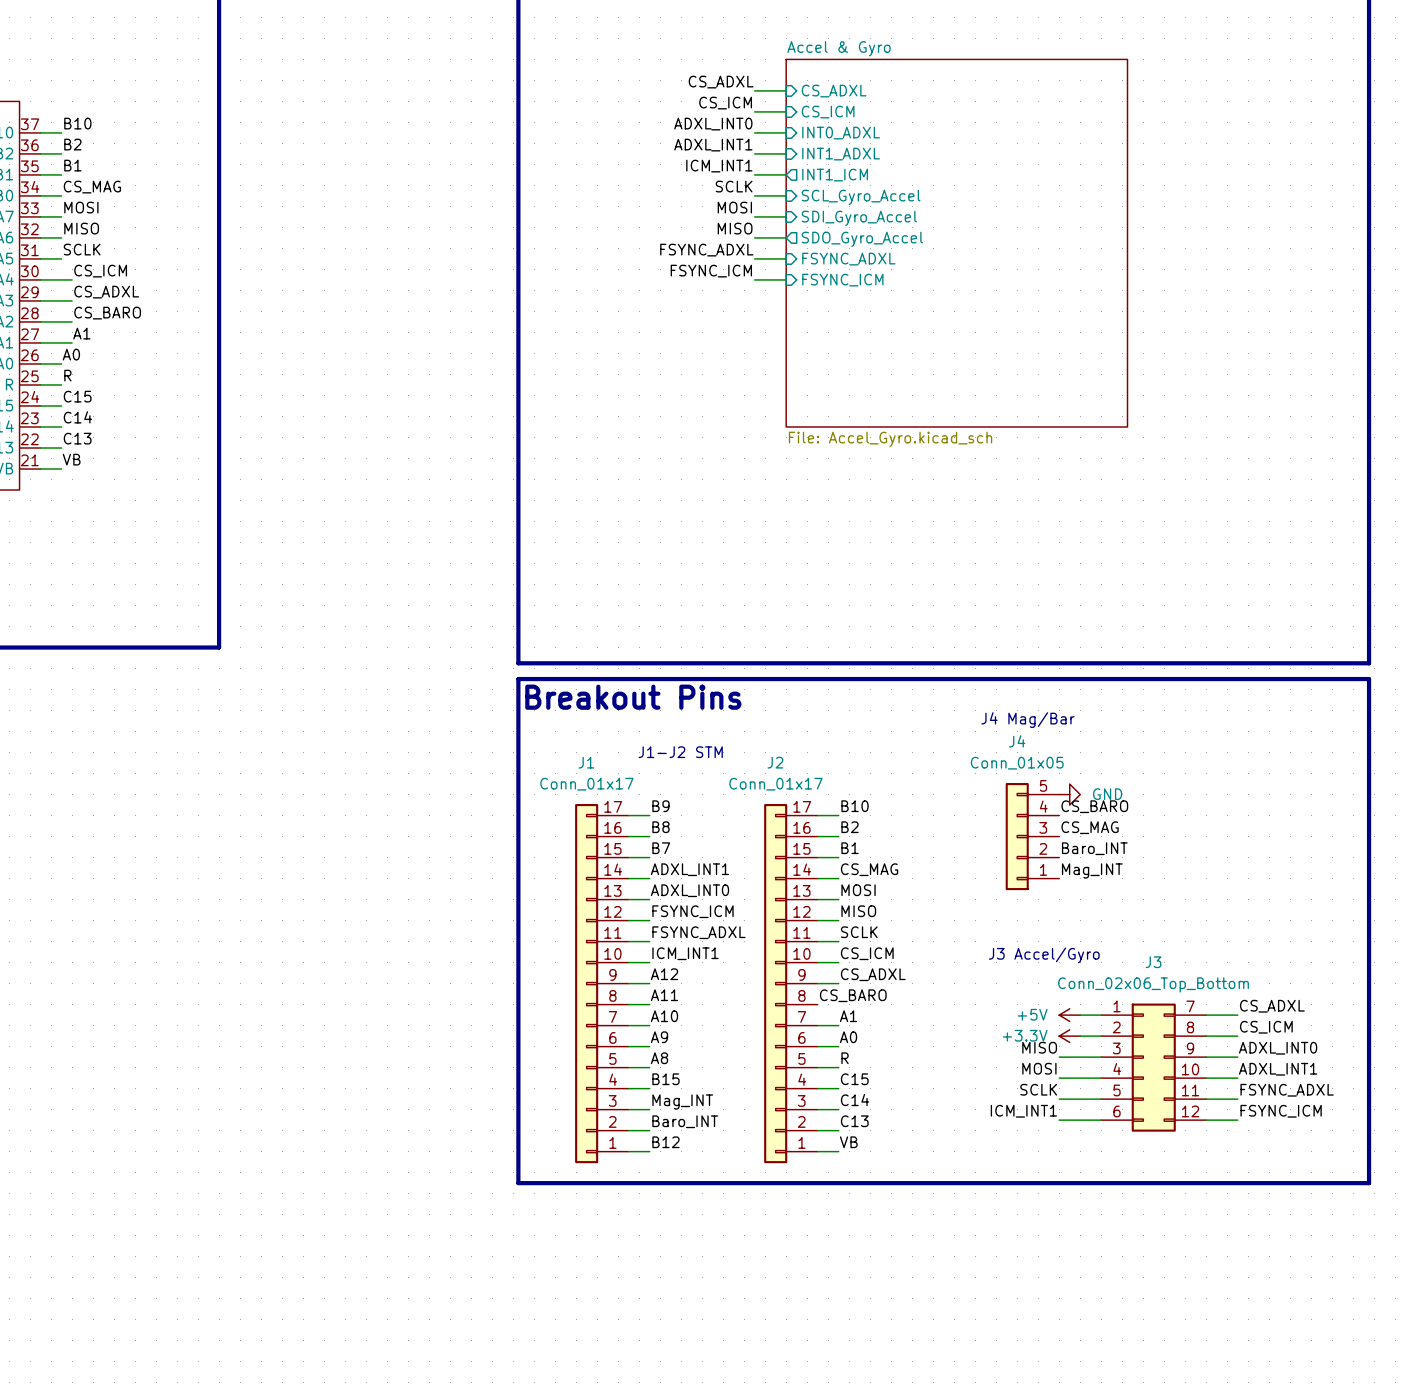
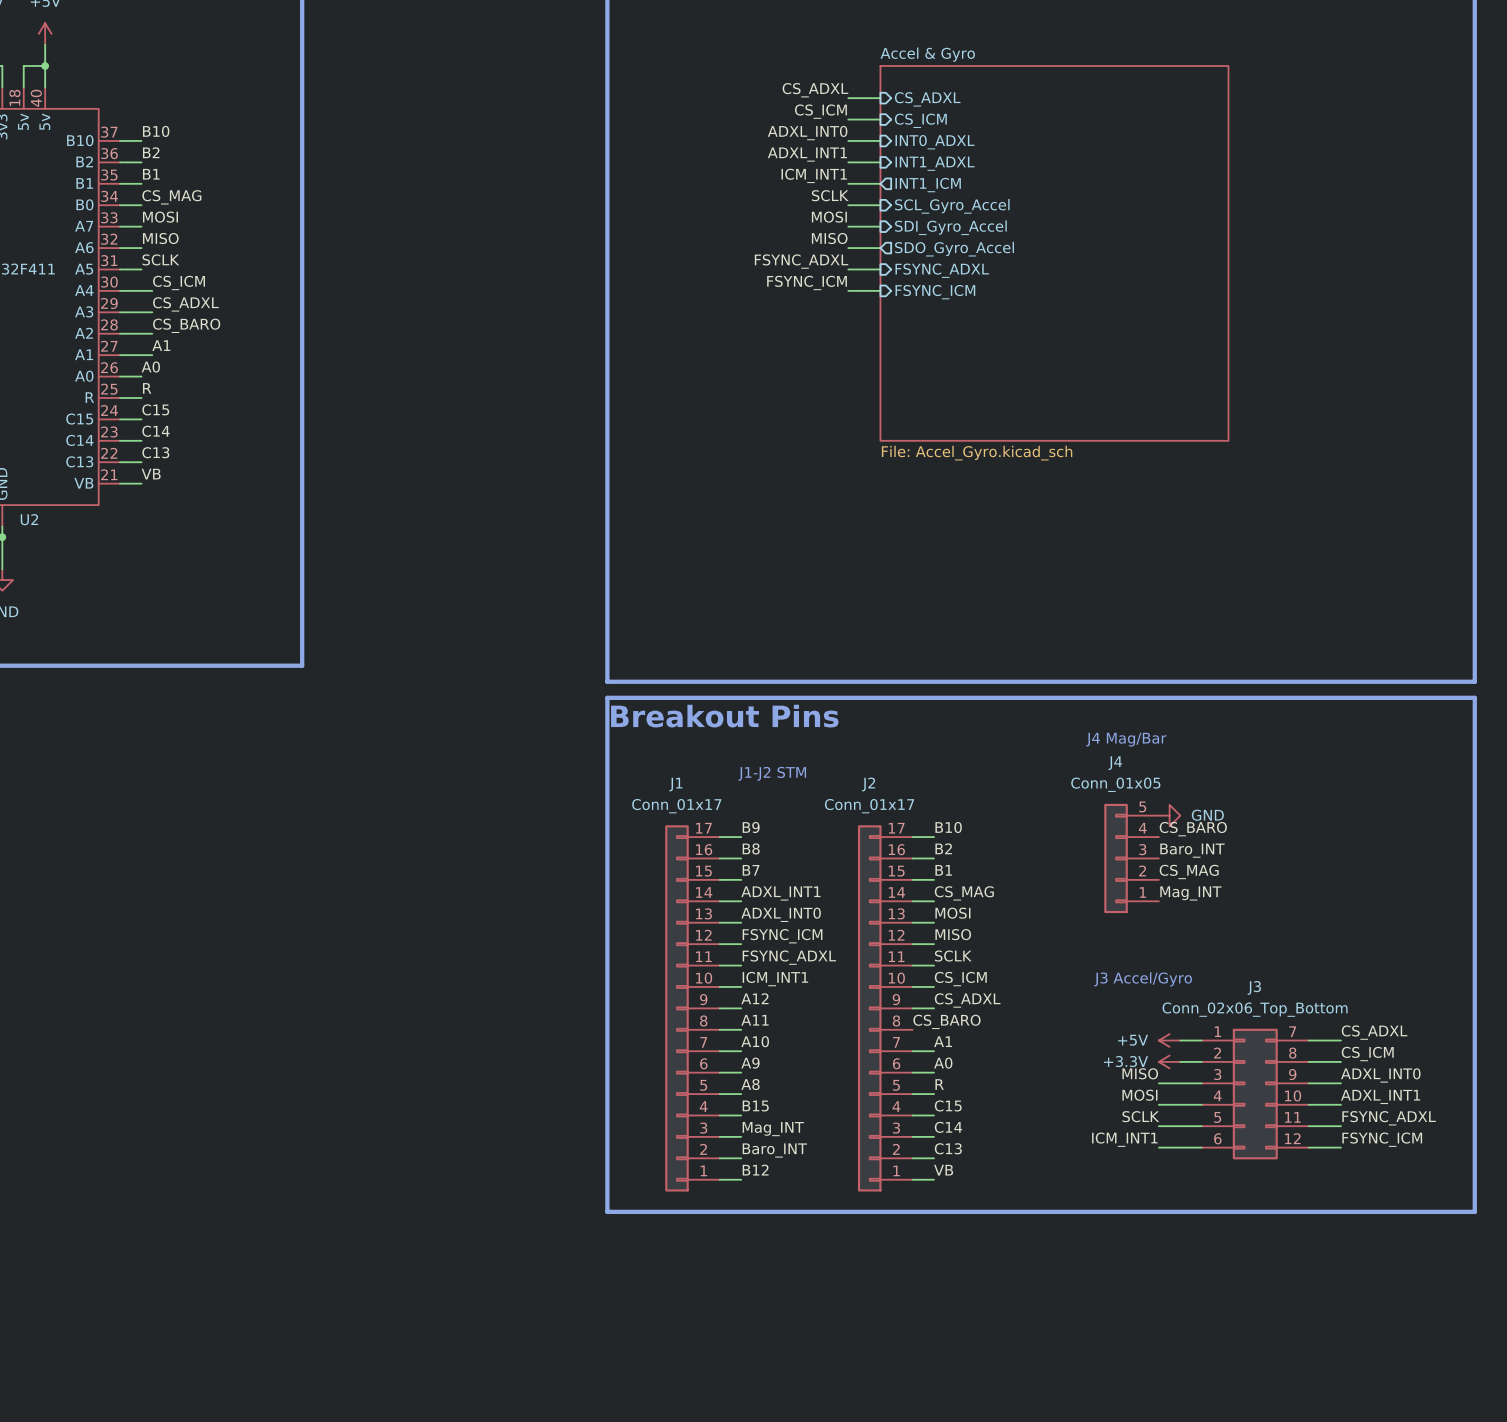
label: CS_MAG (1090, 827) -> Baro_INT (1192, 850)
label: Baro_INT (1094, 848) -> CS_MAG (1189, 871)

